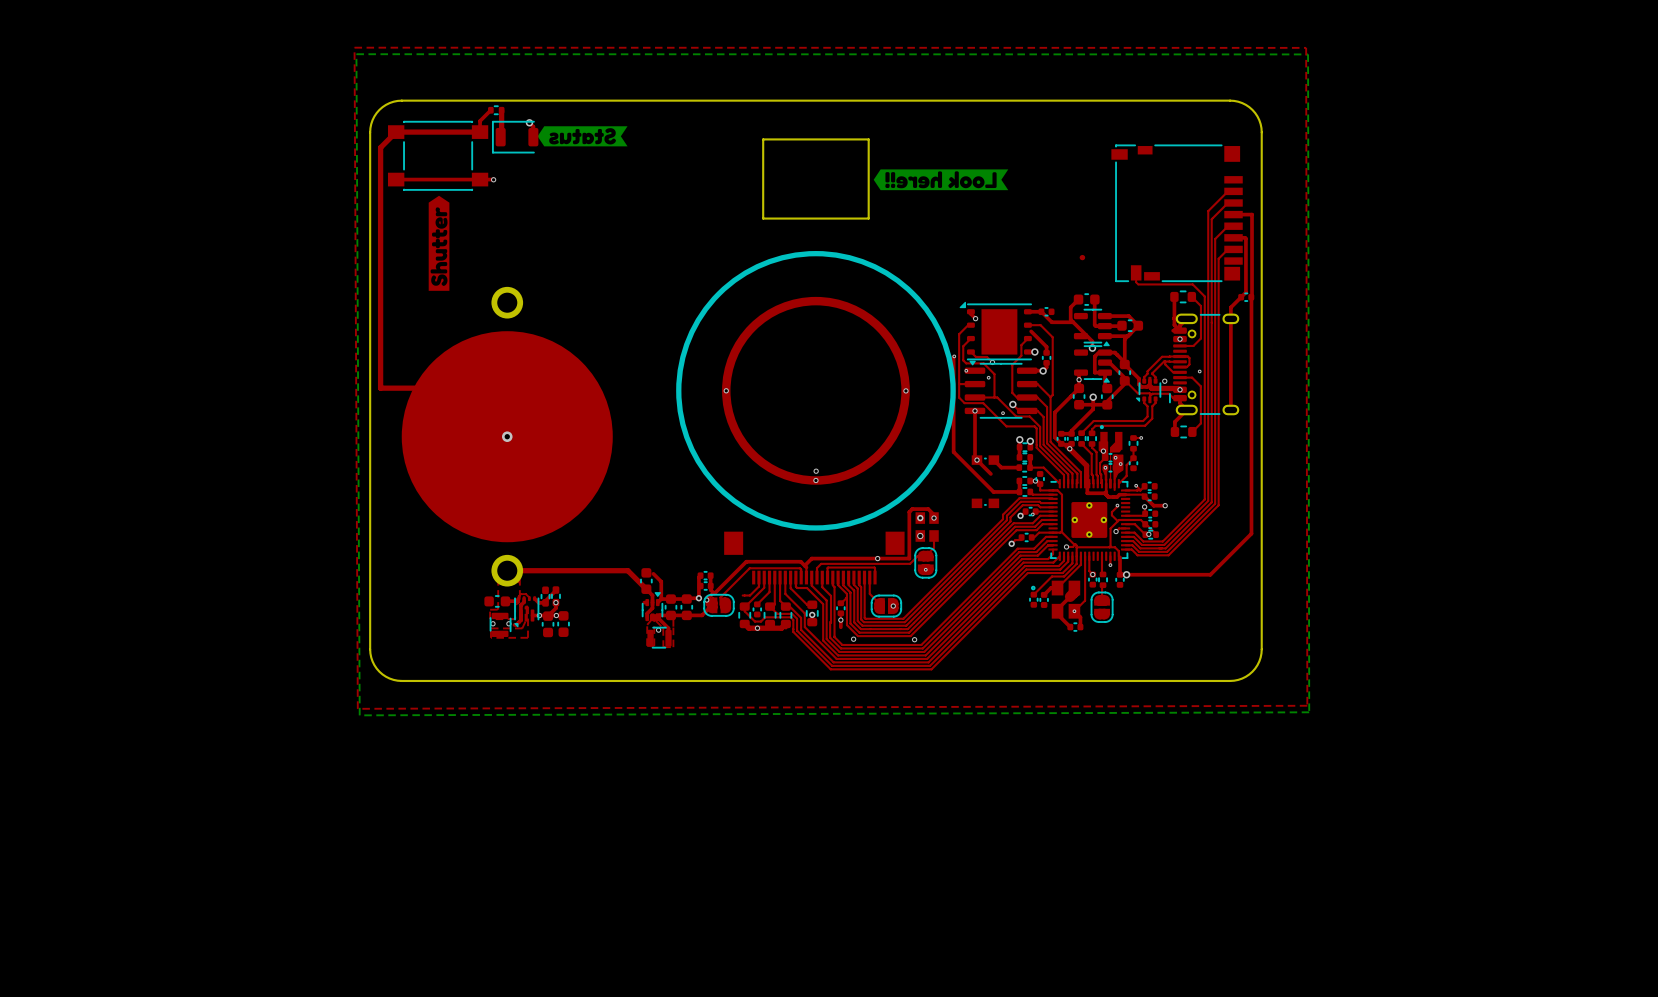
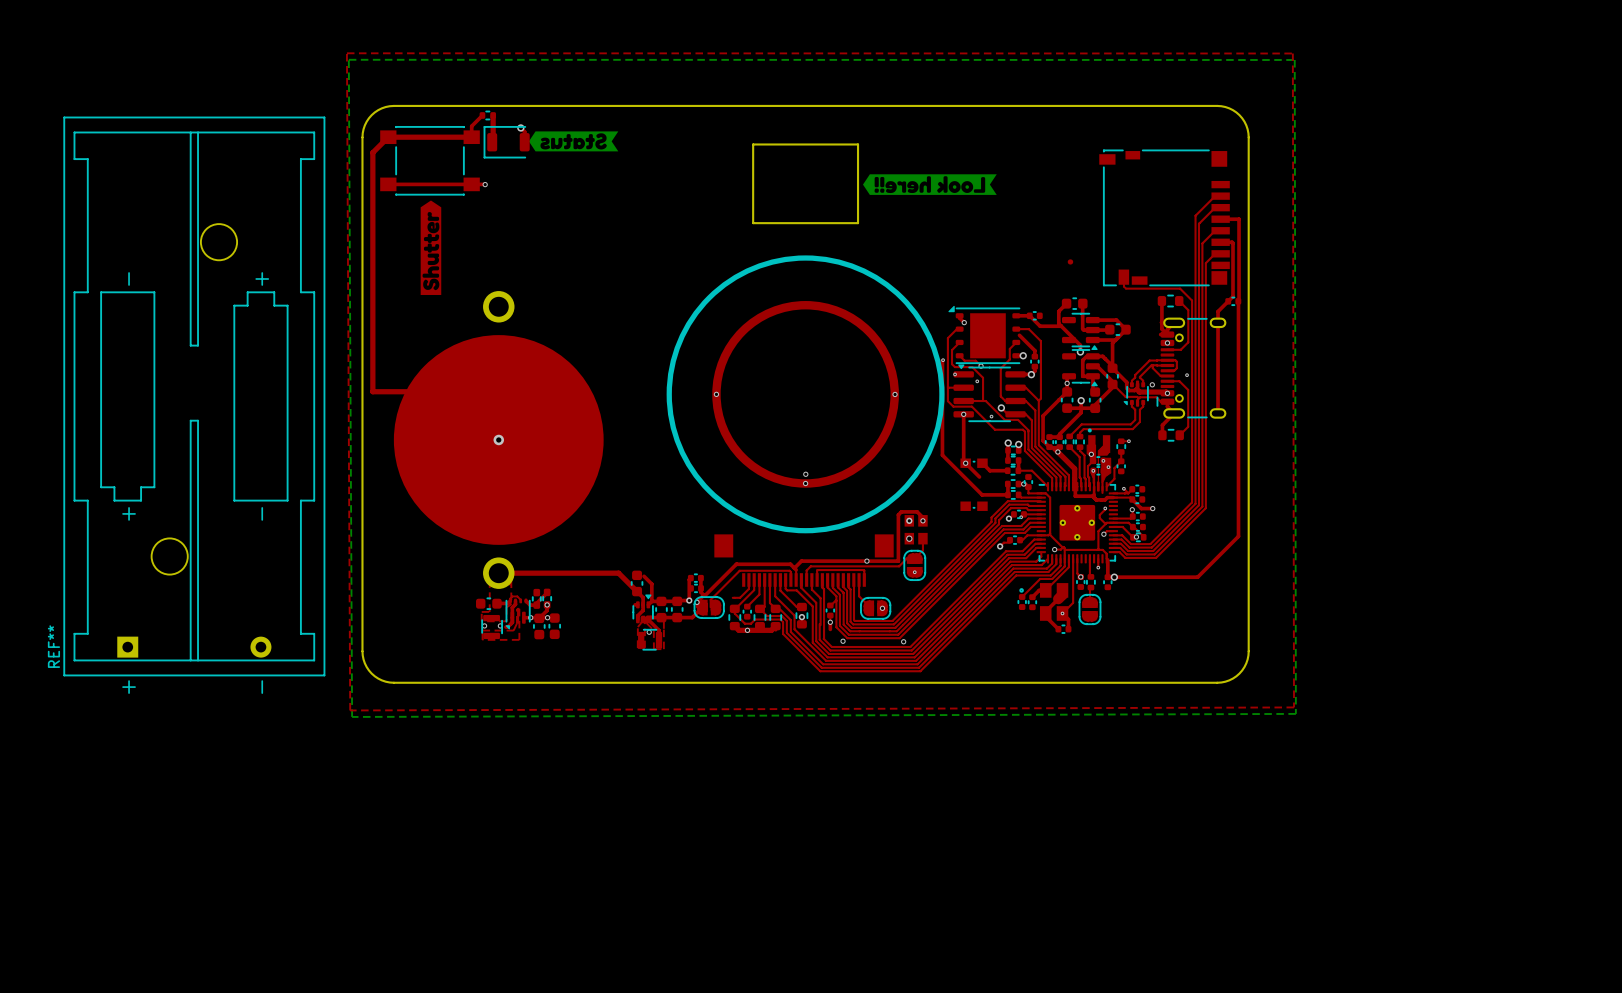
REF**: none -> (194, 396)

